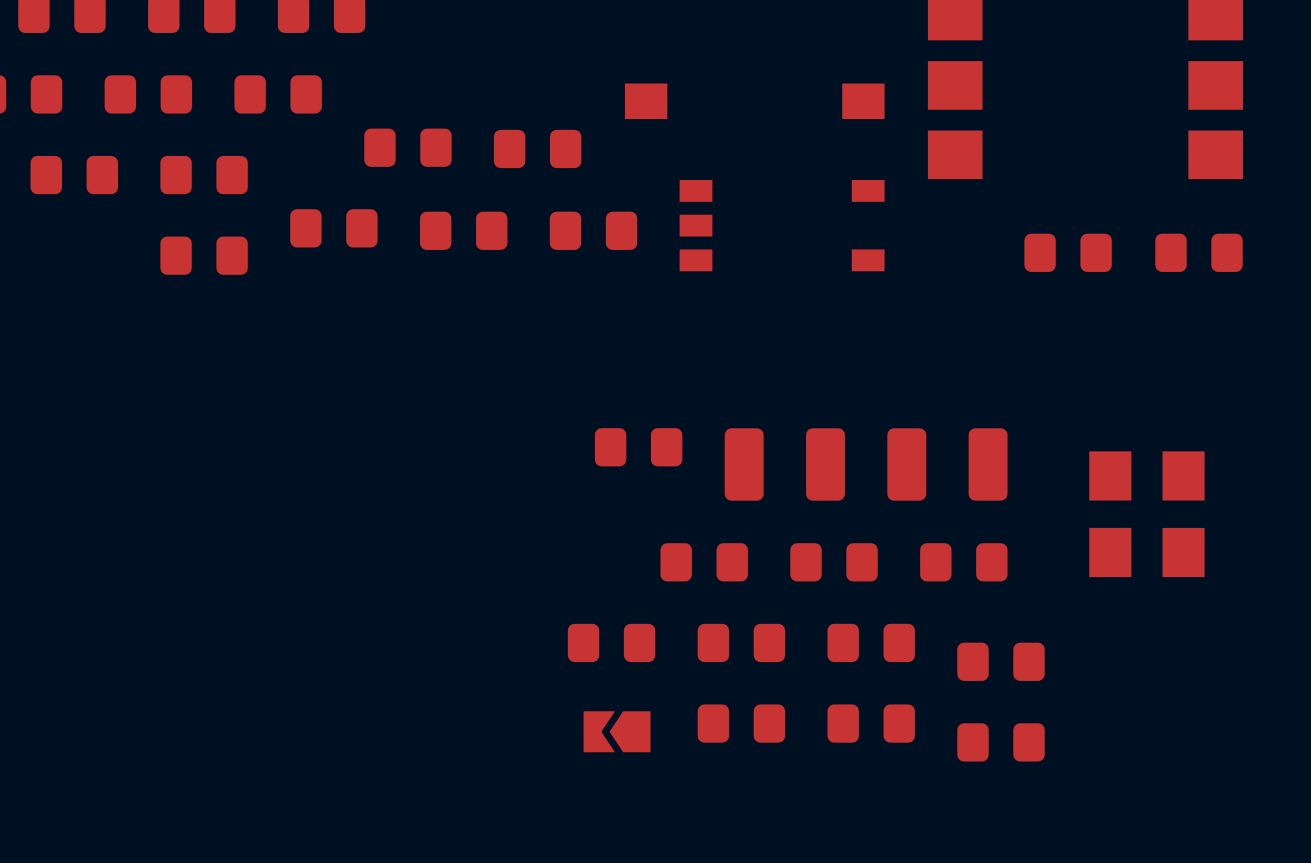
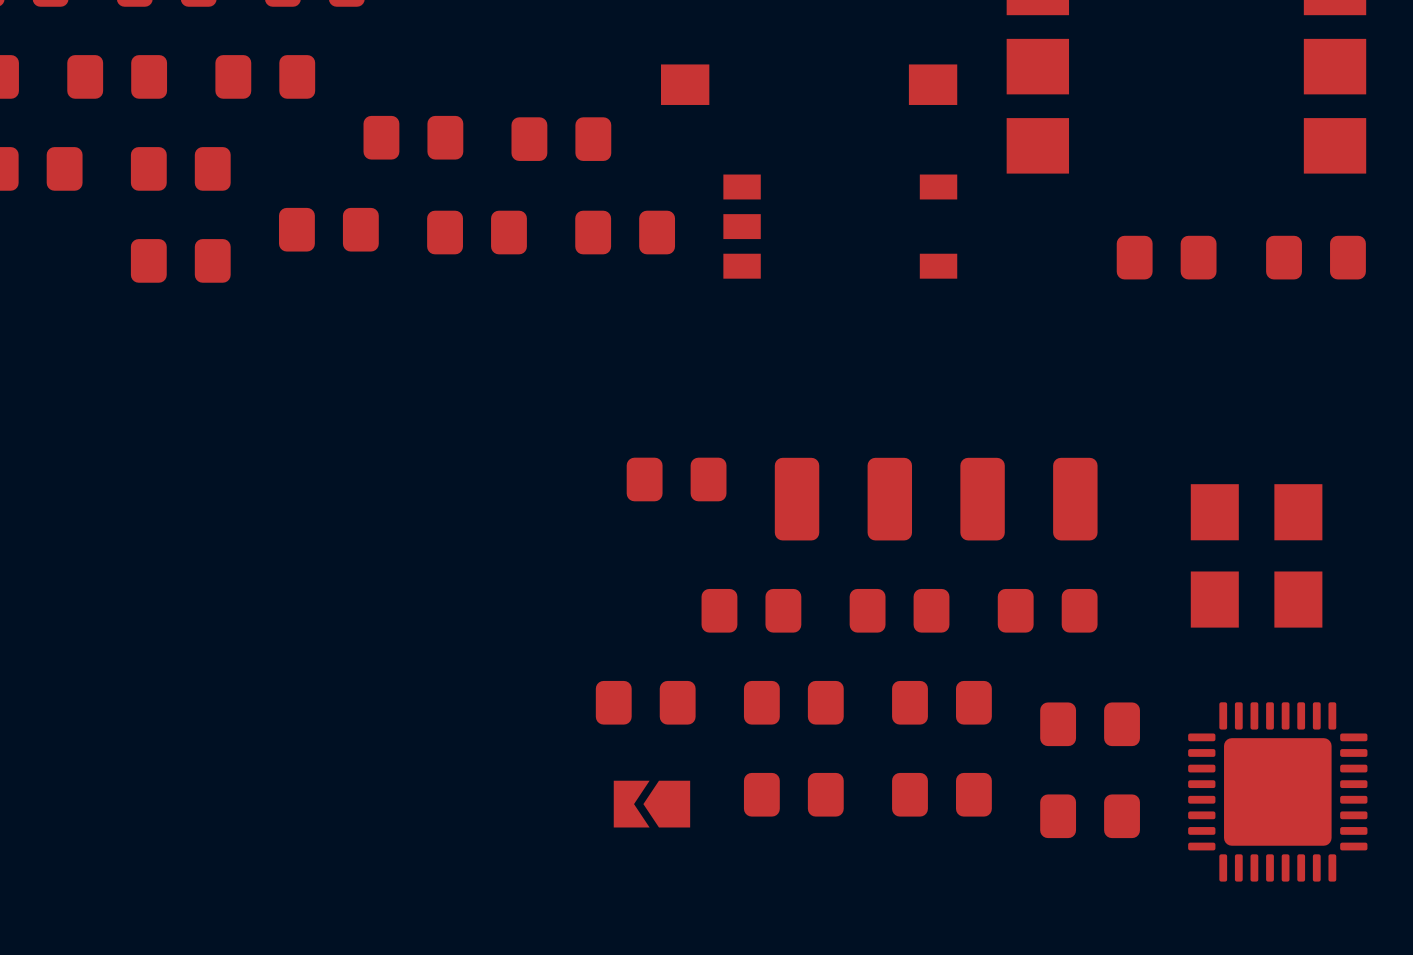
part: none -> (1277, 791)

